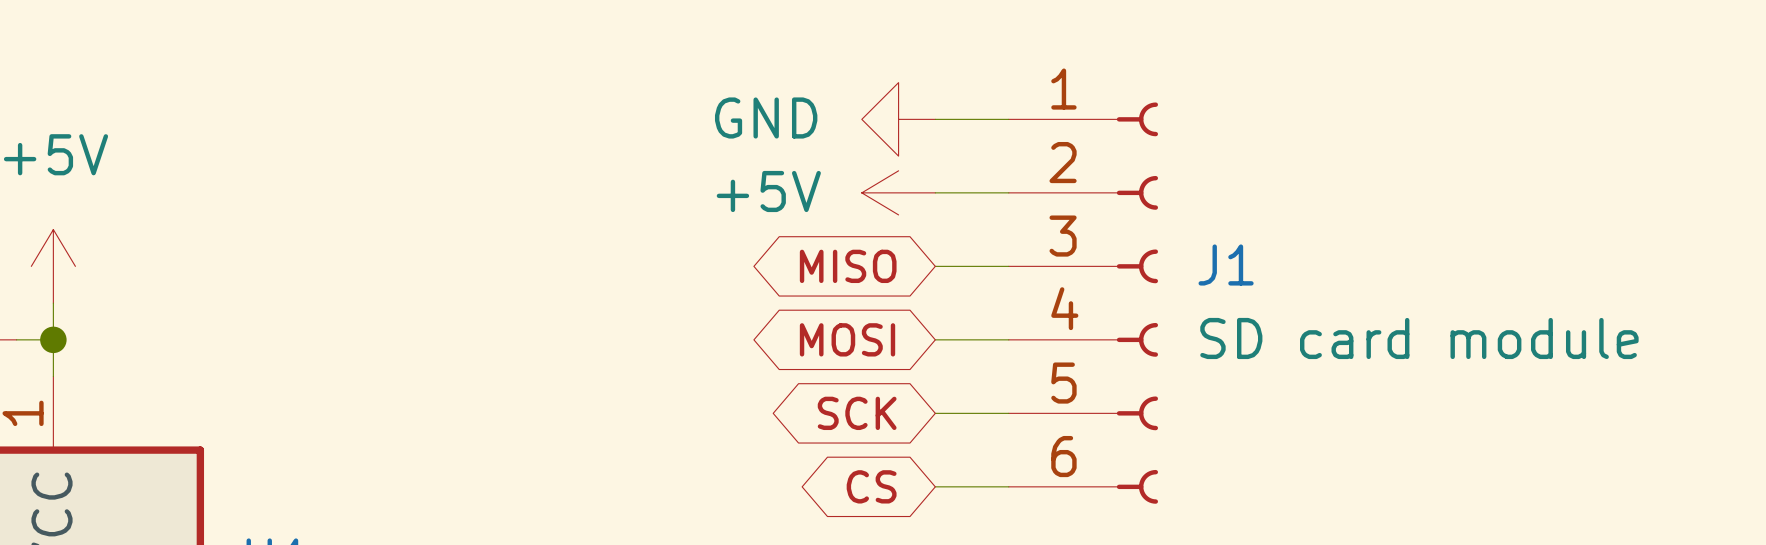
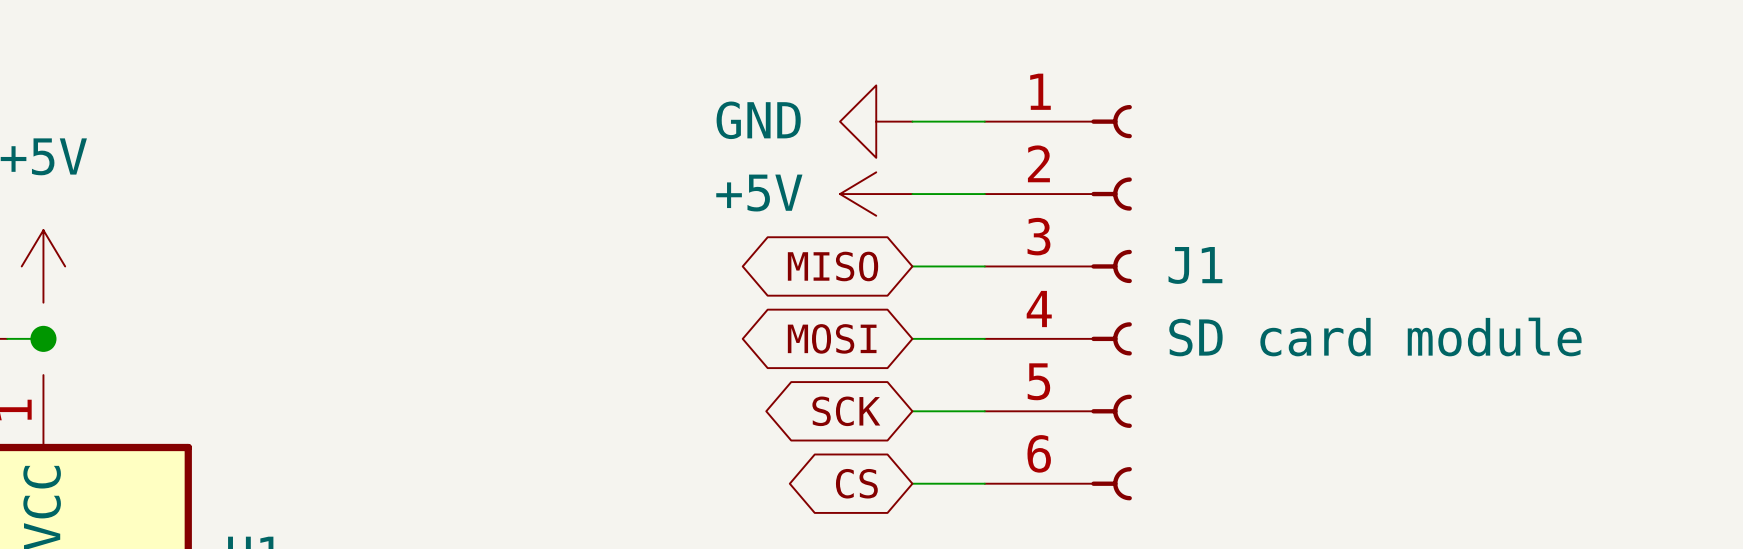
wire: (53, 303) (53, 376) -> none

